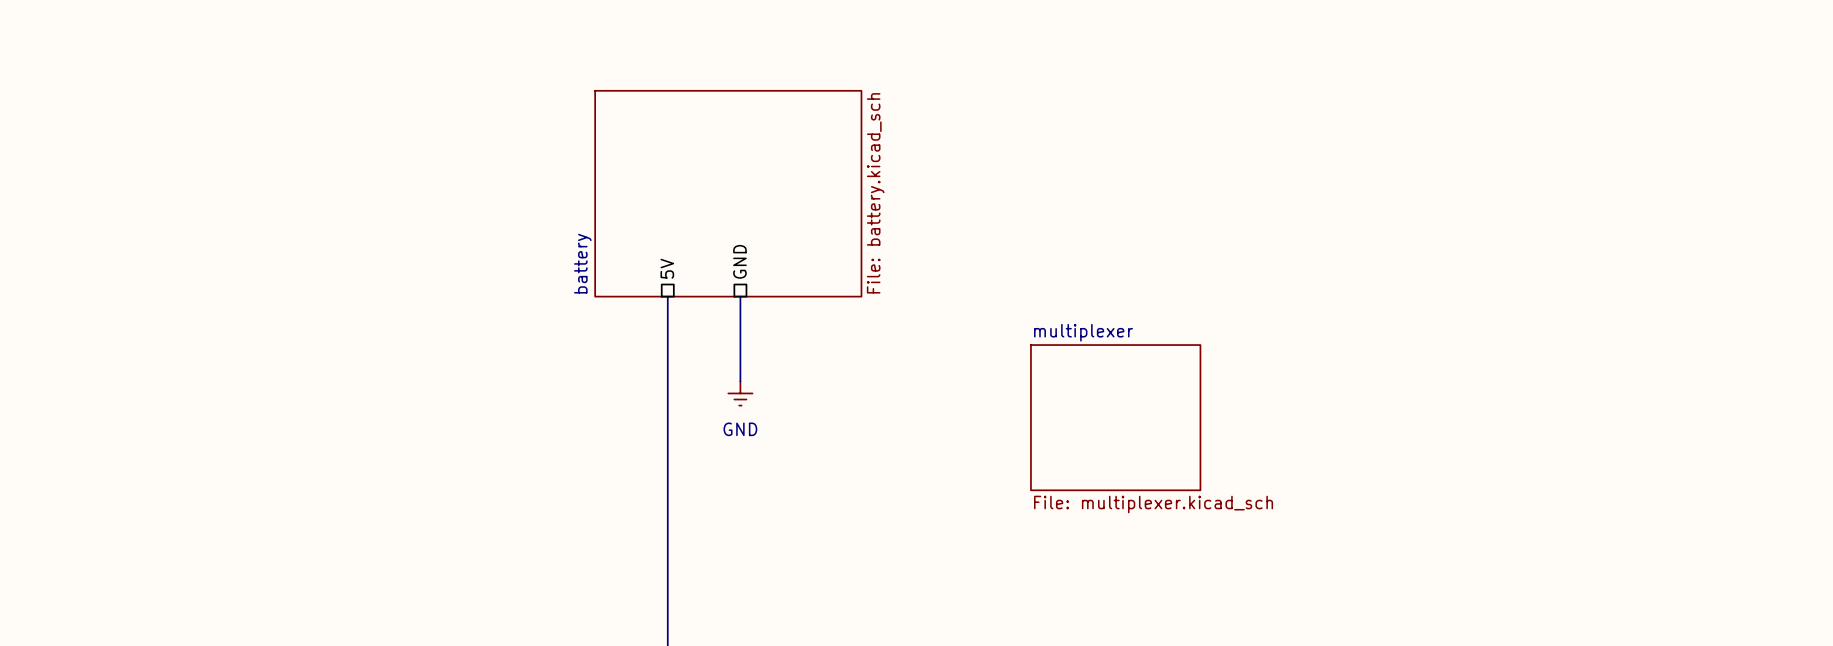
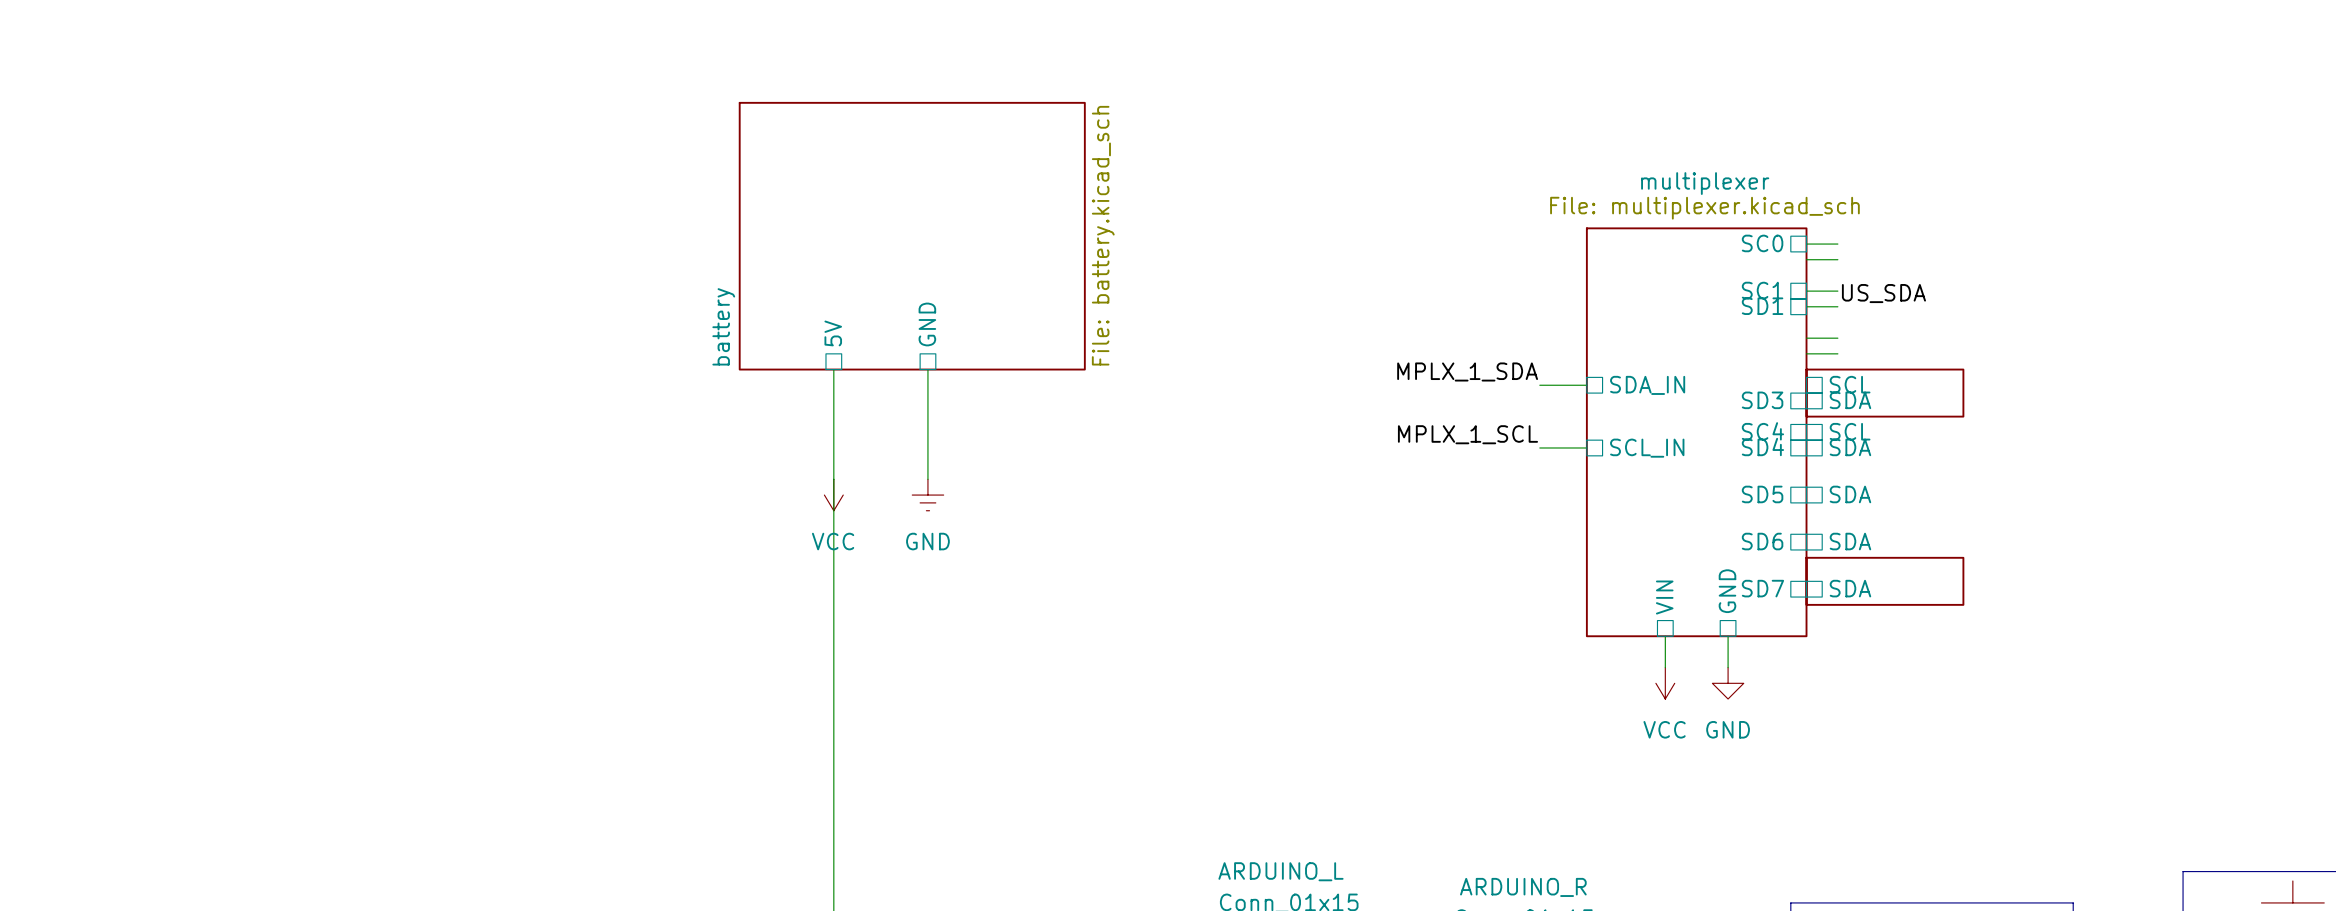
sheet pin: none -> SC0 (1762, 243)
wire: none -> (1806, 244) (1837, 244)
wire: none -> (1806, 259) (1837, 259)
sheet pin: none -> SC1 (1762, 290)
wire: none -> (1806, 291) (1837, 291)
label: none -> US_SDA (1883, 293)
sheet pin: none -> SD1 (1762, 306)
wire: none -> (1806, 306) (1837, 306)
wire: none -> (1806, 338) (1837, 338)
wire: none -> (1806, 353) (1837, 353)
label: none -> MPLX_1_SDA (1467, 371)
wire: none -> (1539, 385) (1586, 385)
sheet pin: none -> SDA_IN (1647, 385)
sheet pin: none -> SCL (1850, 384)
sheet: none -> (1884, 393)
sheet pin: none -> SD3 (1762, 400)
sheet pin: none -> SDA (1850, 400)
sheet pin: none -> SC4 (1762, 431)
sheet pin: none -> SCL (1850, 431)
sheet multiplexer: none -> File: multiplexer.kicad_sch (1696, 432)
label: none -> MPLX_1_SCL (1467, 434)
sheet pin: none -> SD4 (1762, 447)
sheet pin: none -> SDA (1850, 447)
wire: none -> (1539, 447) (1586, 447)
sheet pin: none -> SCL_IN (1647, 448)
power symbol: none -> VCC (833, 495)
sheet pin: none -> SD5 (1762, 494)
sheet pin: none -> SDA (1850, 494)
sheet multiplexer: File: multiplexer.kicad_sch (1115, 417) -> none
sheet pin: none -> SD6 (1762, 541)
sheet pin: none -> SDA (1850, 541)
sheet: none -> (1884, 581)
sheet pin: none -> SD7 (1762, 588)
sheet pin: none -> SDA (1850, 588)
sheet pin: none -> GND (1727, 591)
sheet pin: none -> VIN (1664, 597)
wire: none -> (1665, 636) (1665, 667)
wire: none -> (1728, 636) (1728, 667)
power symbol: none -> VCC (1665, 683)
power symbol: none -> GND (1728, 683)

